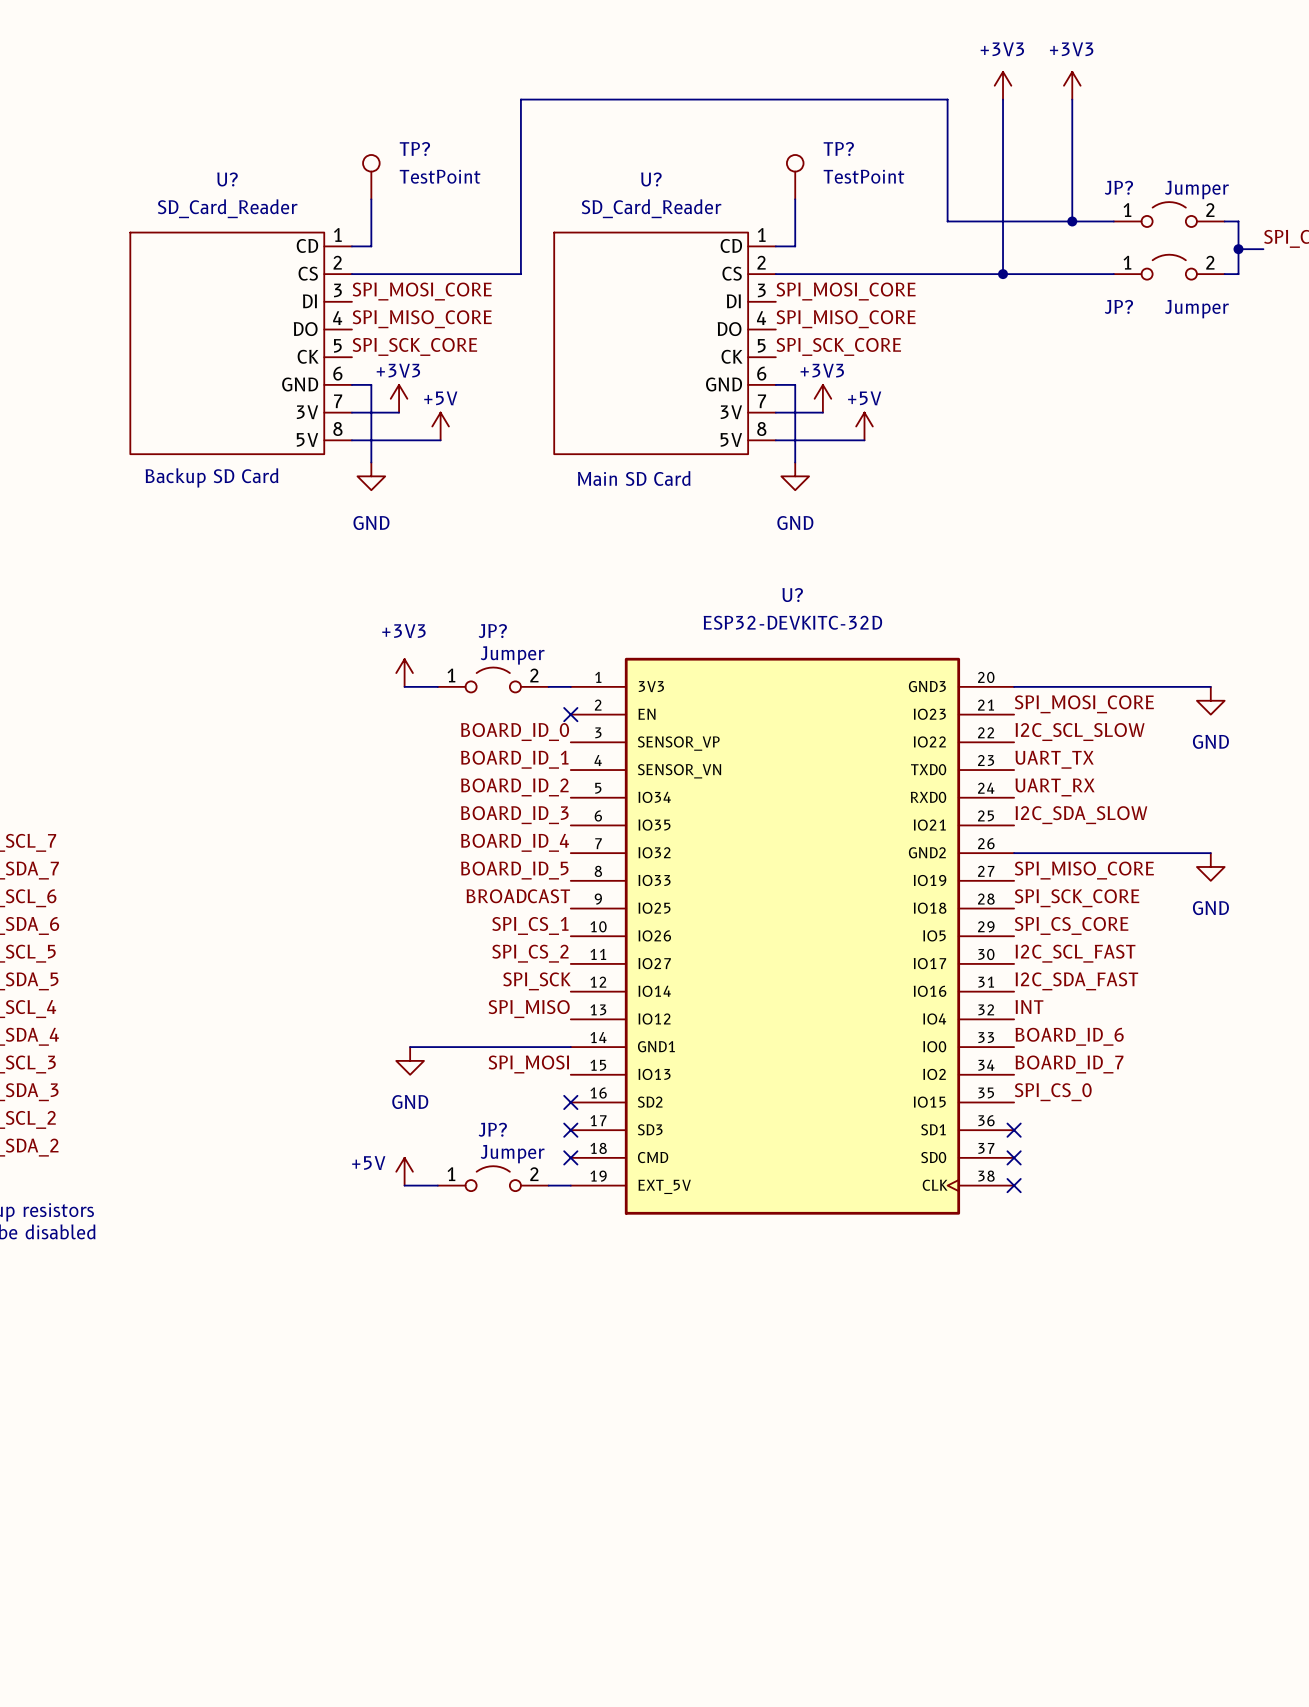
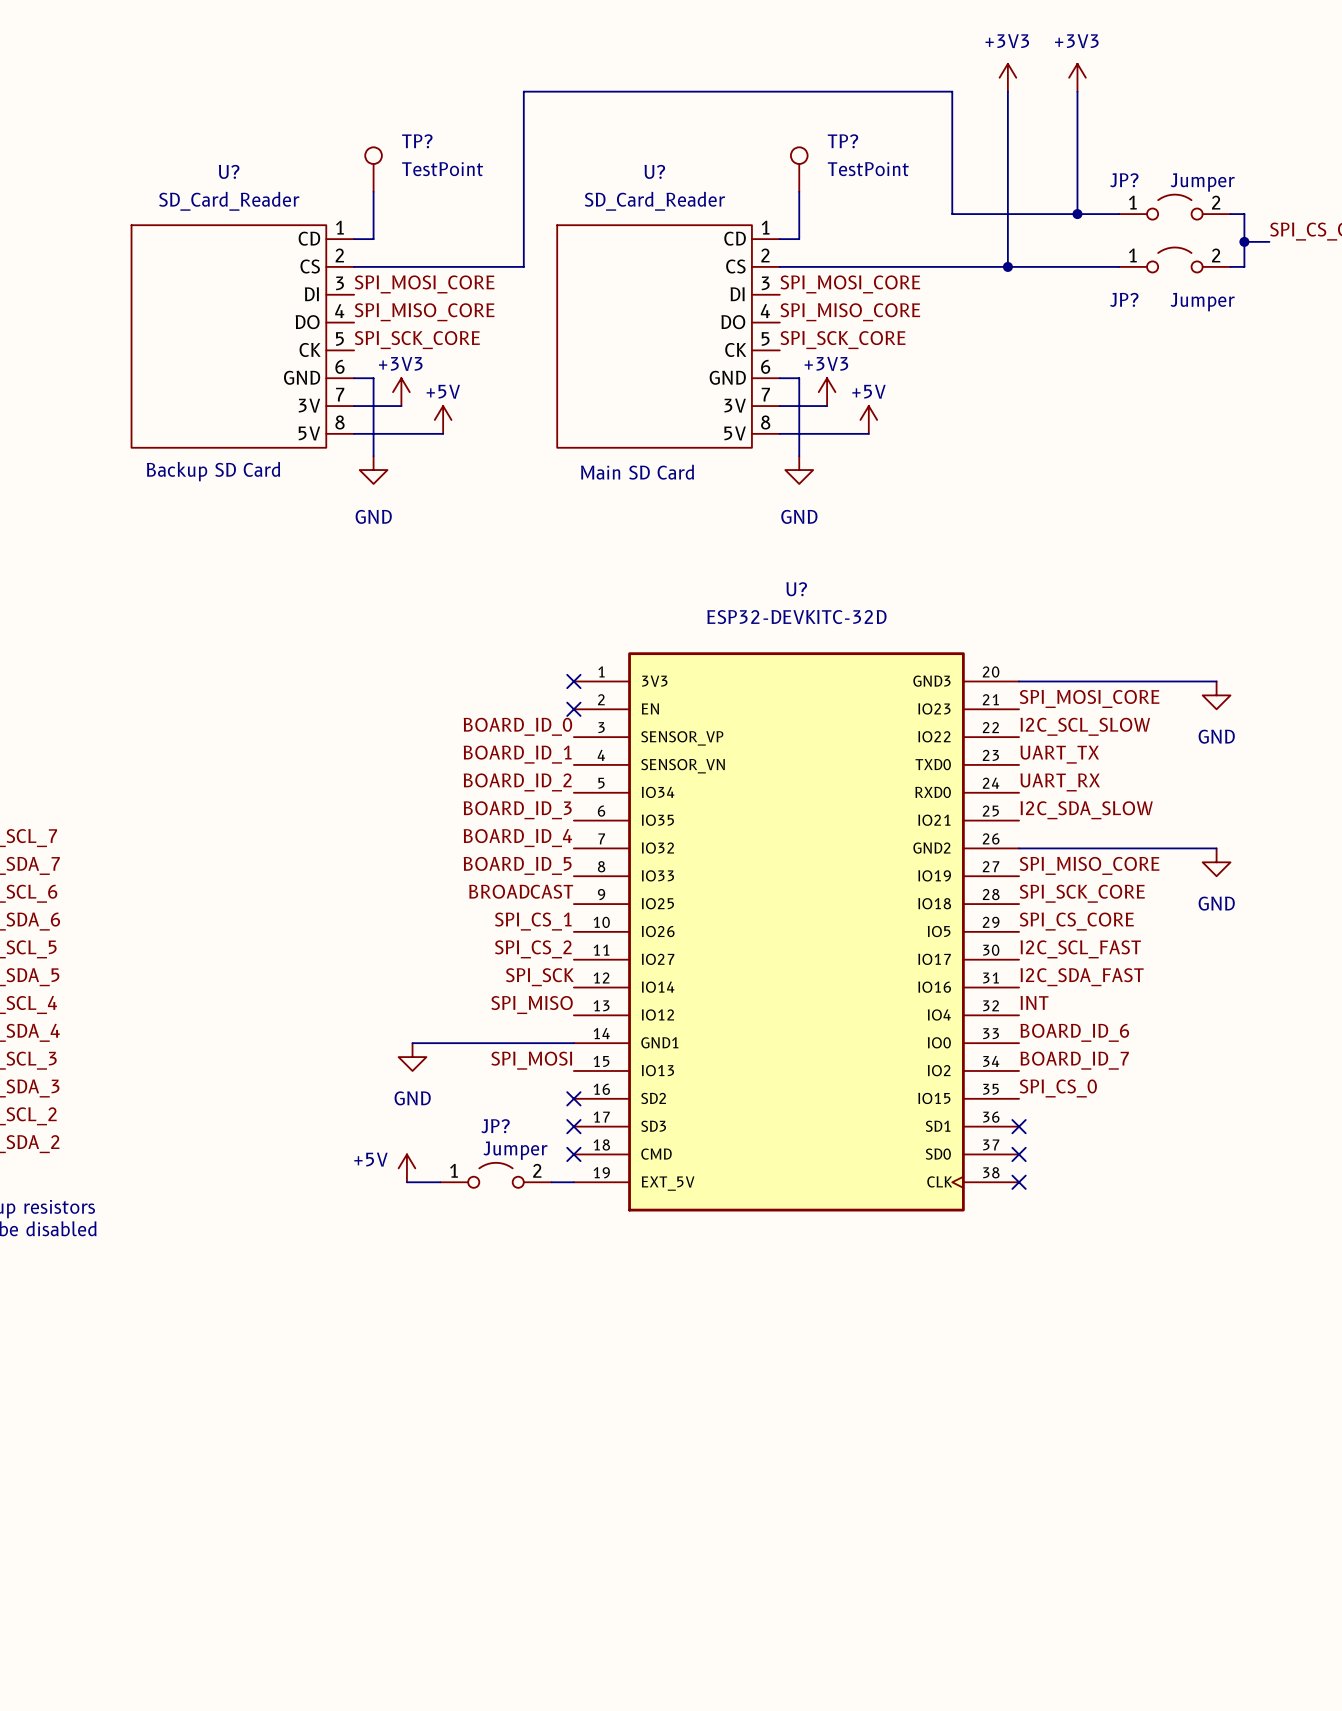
power symbol: +3V3 (404, 673) -> none
JP?: Jumper (493, 679) -> none
wire: (404, 686) (437, 686) -> none
wire: (548, 686) (570, 686) -> none
no-connect mark: none -> (573, 681)

